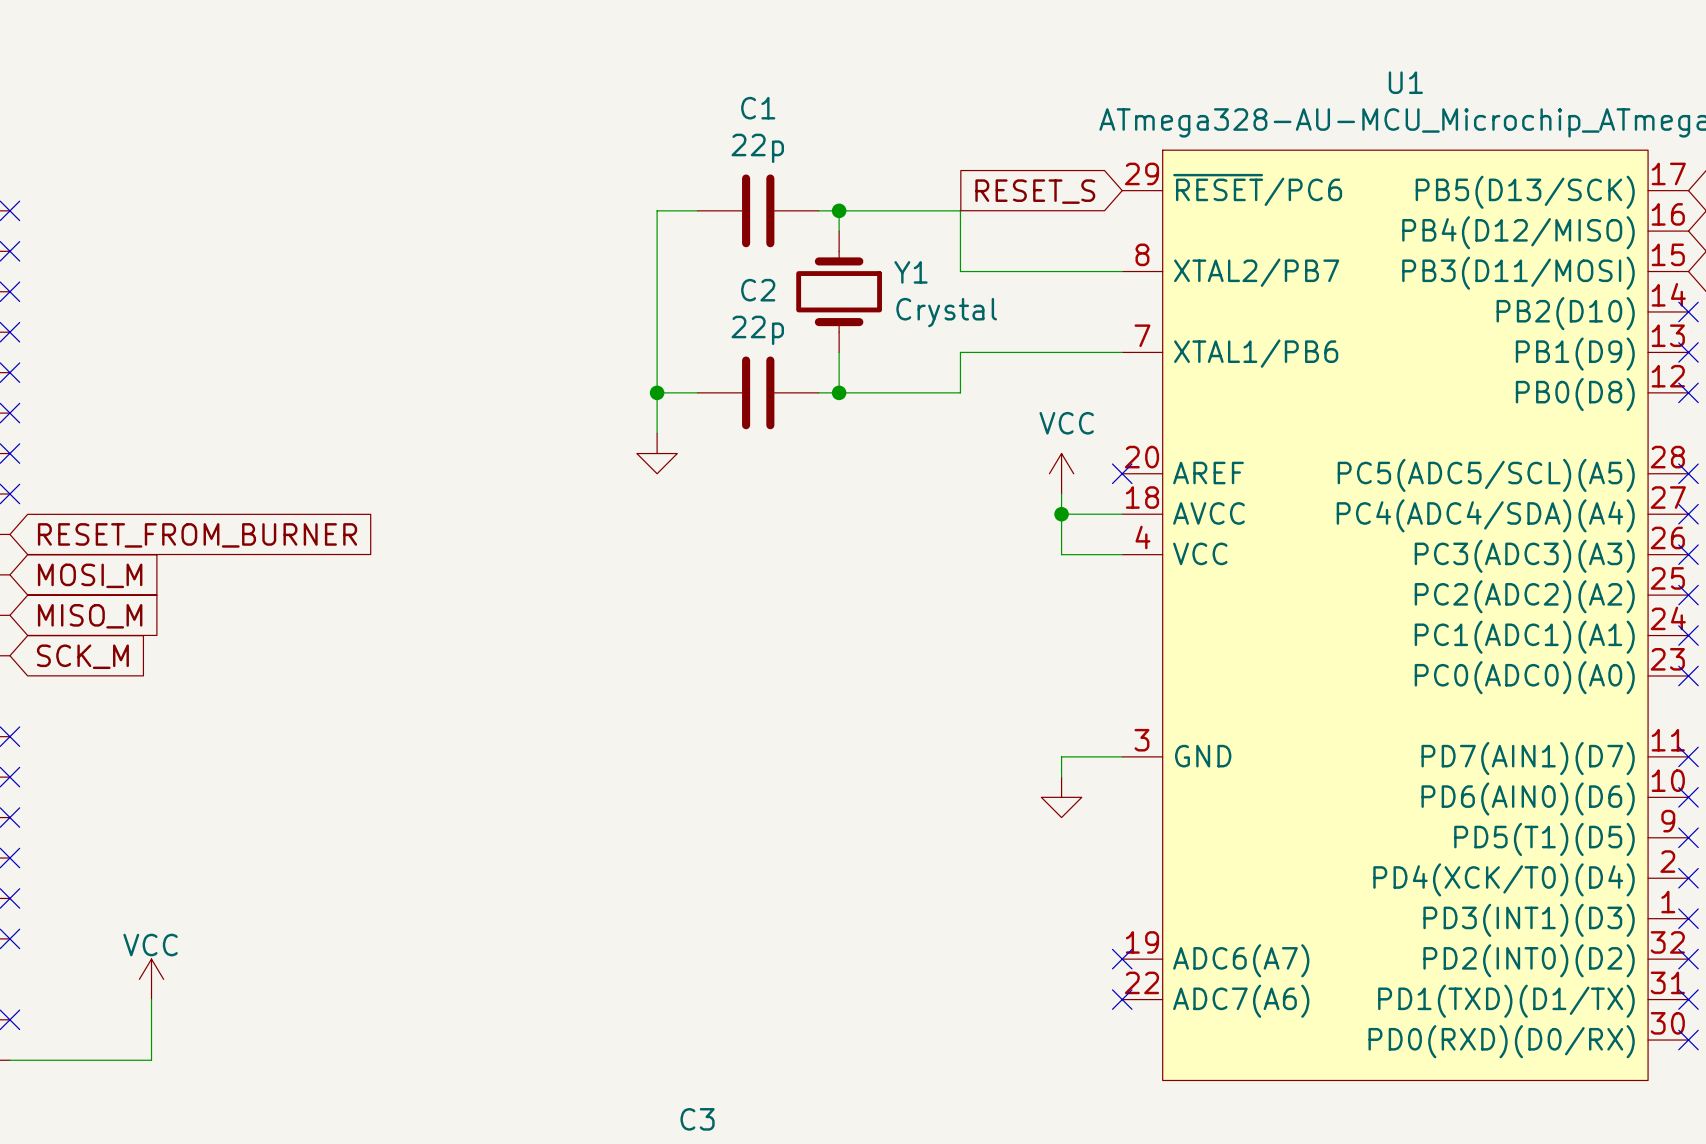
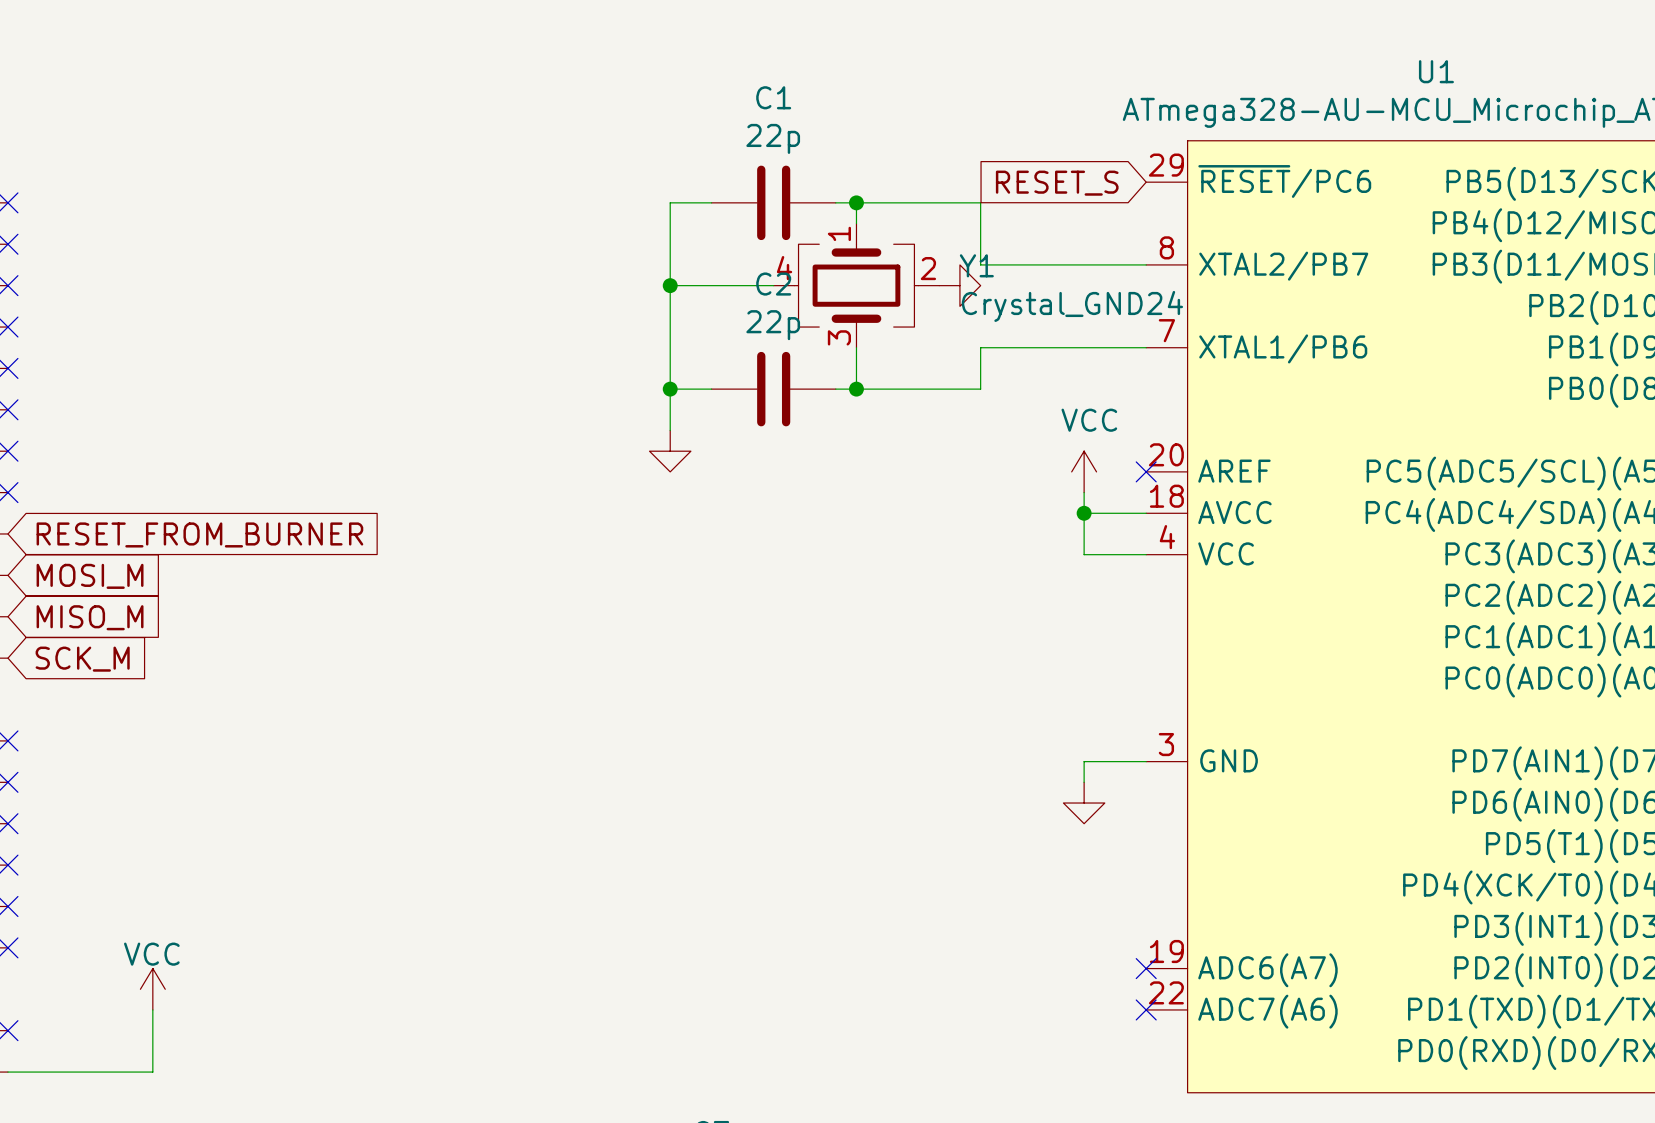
Y1 symbol: [796, 231, 882, 353] -> [773, 223, 940, 348]
Y1 name position: Y1 (911, 272) -> Y1 (976, 265)
wire: none -> (670, 285) (773, 285)
junction: none -> (670, 285)
power symbol: none -> (959, 285)
Y1 value: Crystal (946, 312) -> Crystal_GND24 (1072, 306)

